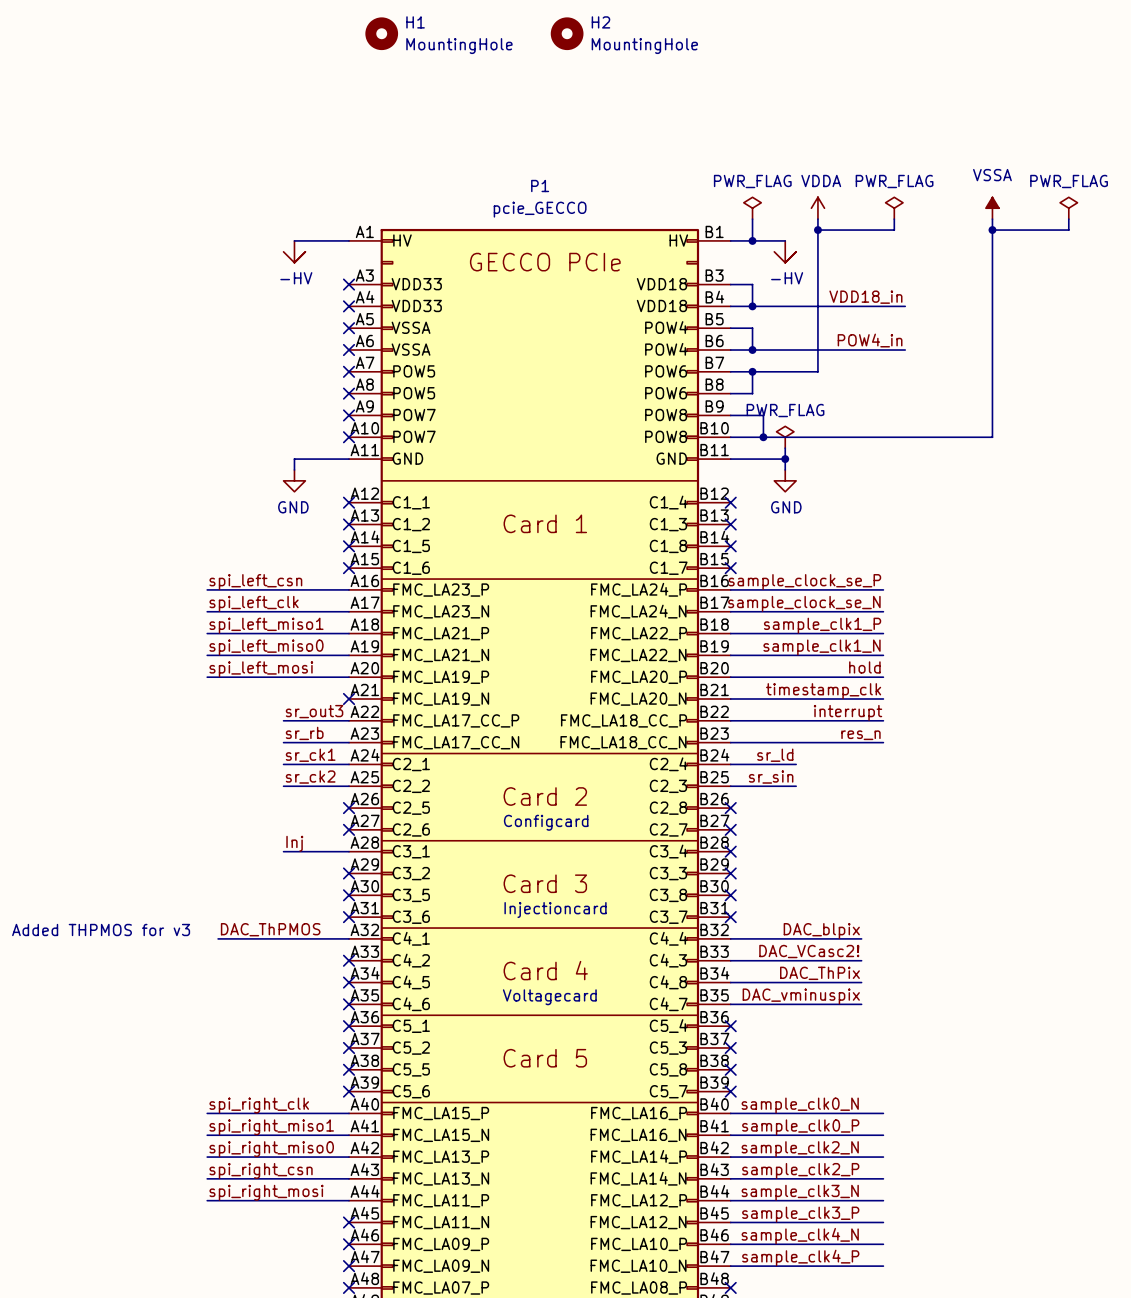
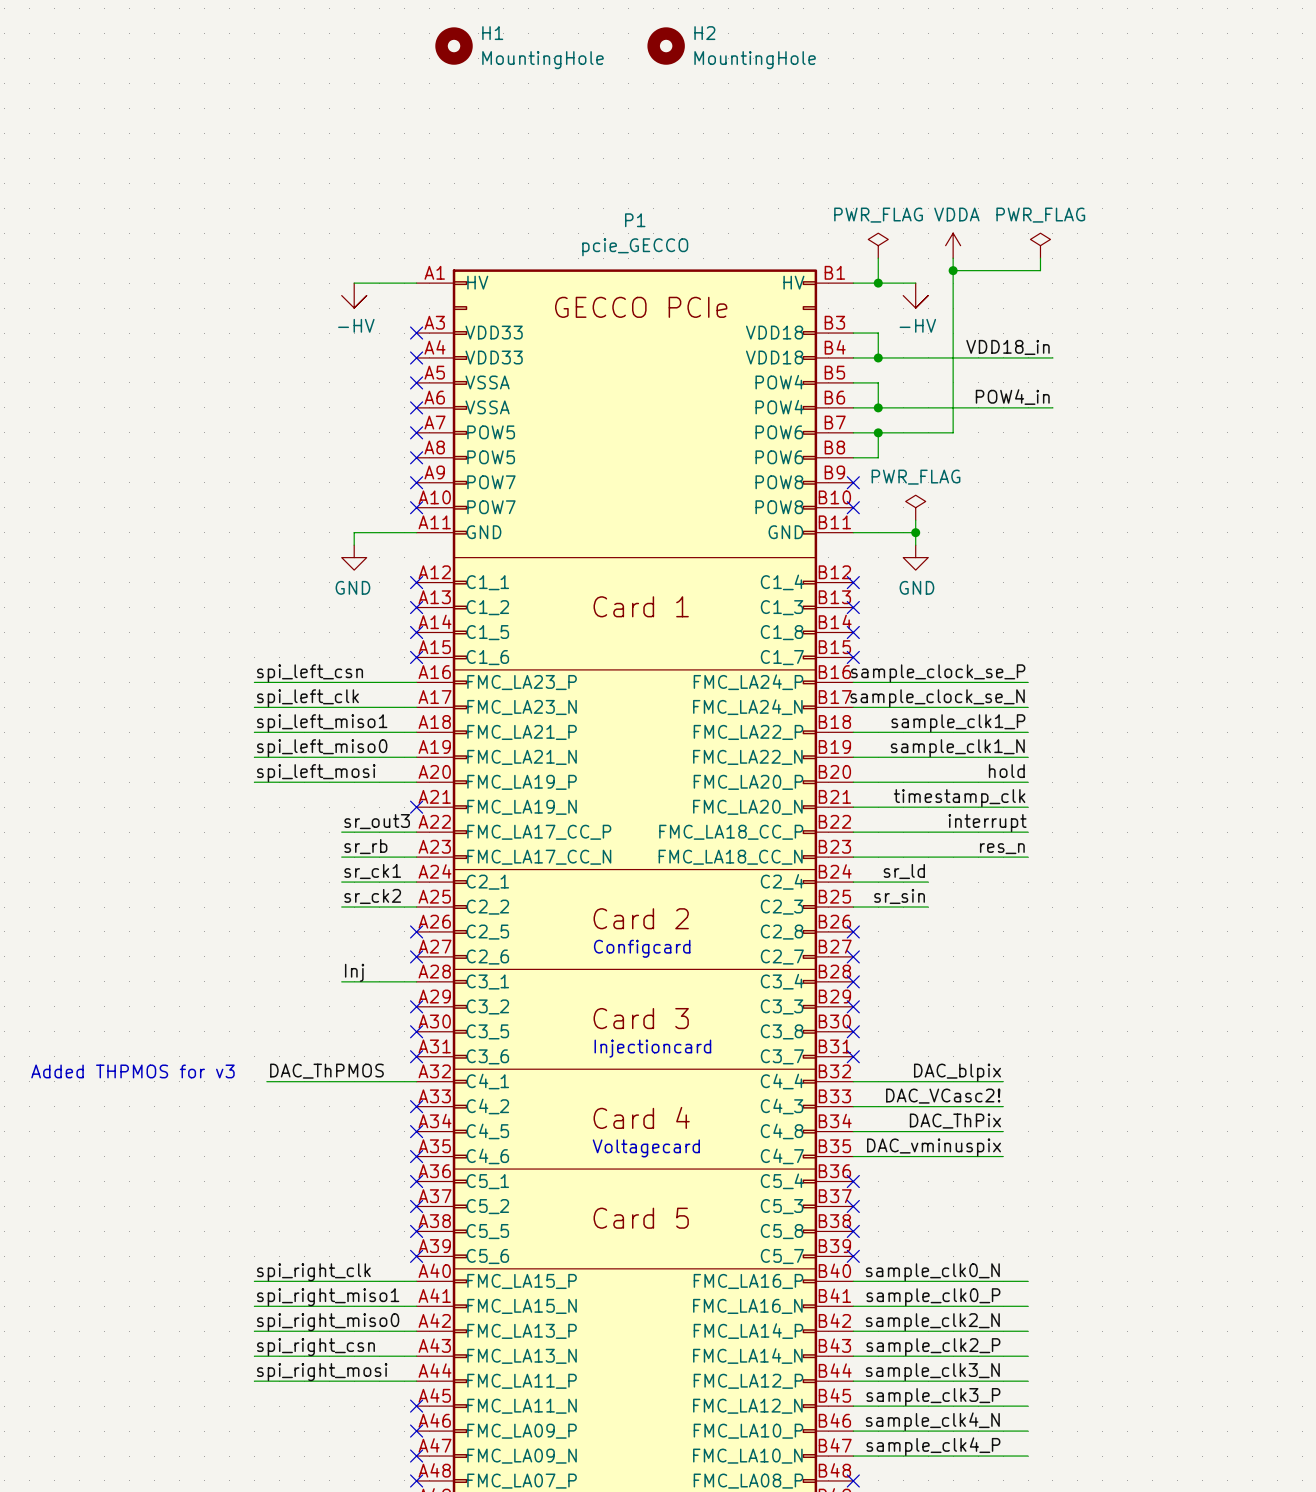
power symbol: VSSA (992, 208) -> none
power symbol: PWR_FLAG (1068, 208) -> none
wire: (992, 219) (992, 437) (730, 437) -> none
wire: (1068, 219) (1068, 230) (992, 230) -> none
junction: (992, 230) -> none
wire: (730, 415) (763, 415) (763, 437) -> none
no-connect mark: none -> (853, 482)
no-connect mark: none -> (853, 507)
junction: (763, 437) -> none

